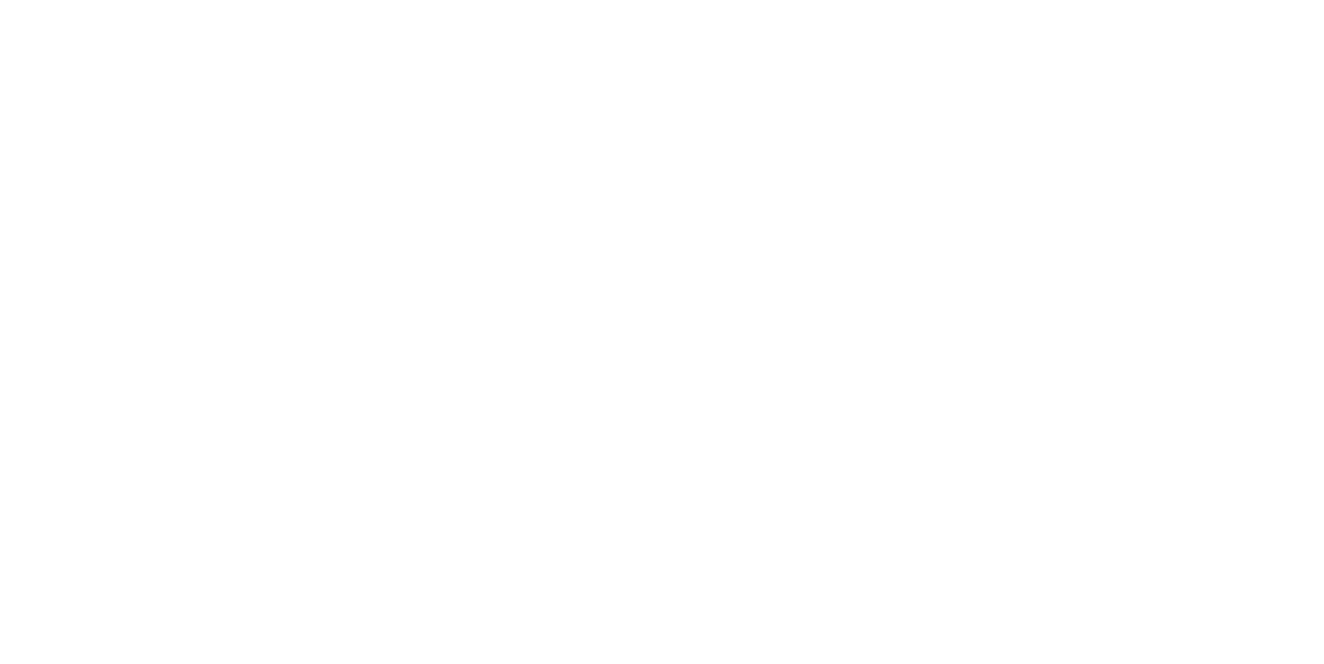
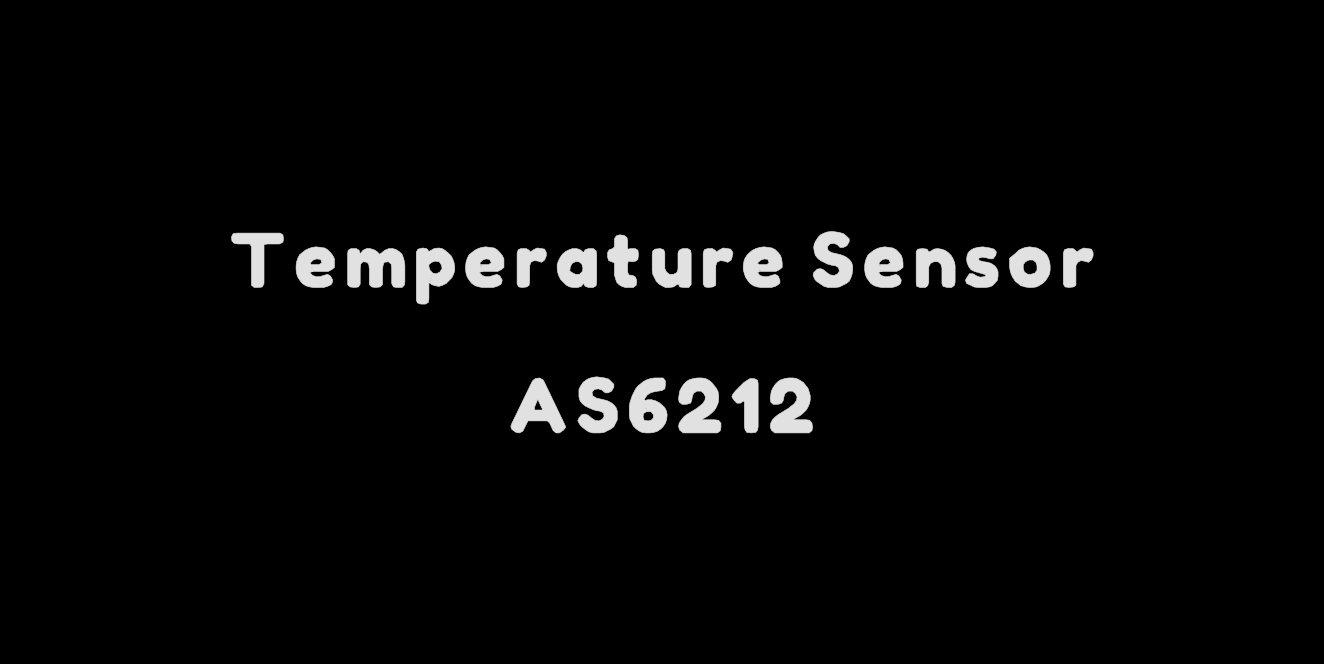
drawing: none -> [231, 231, 1094, 305]
drawing: none -> [510, 376, 813, 434]

